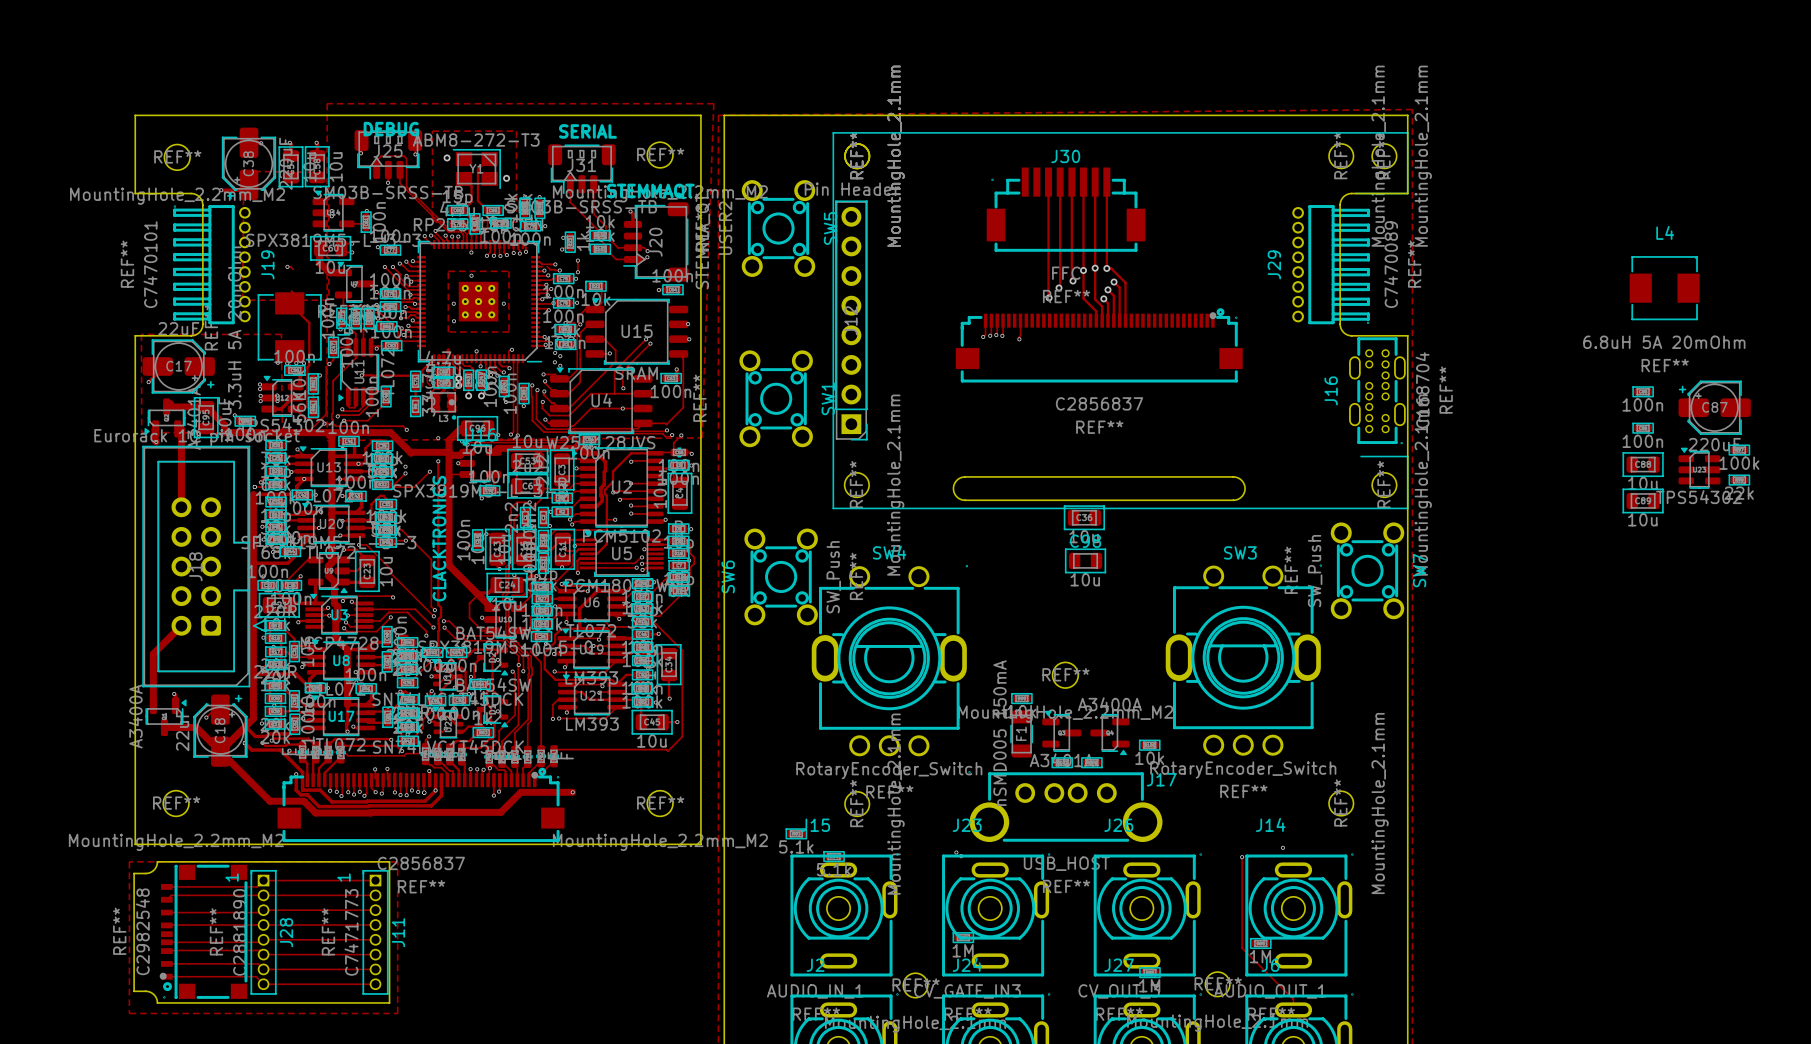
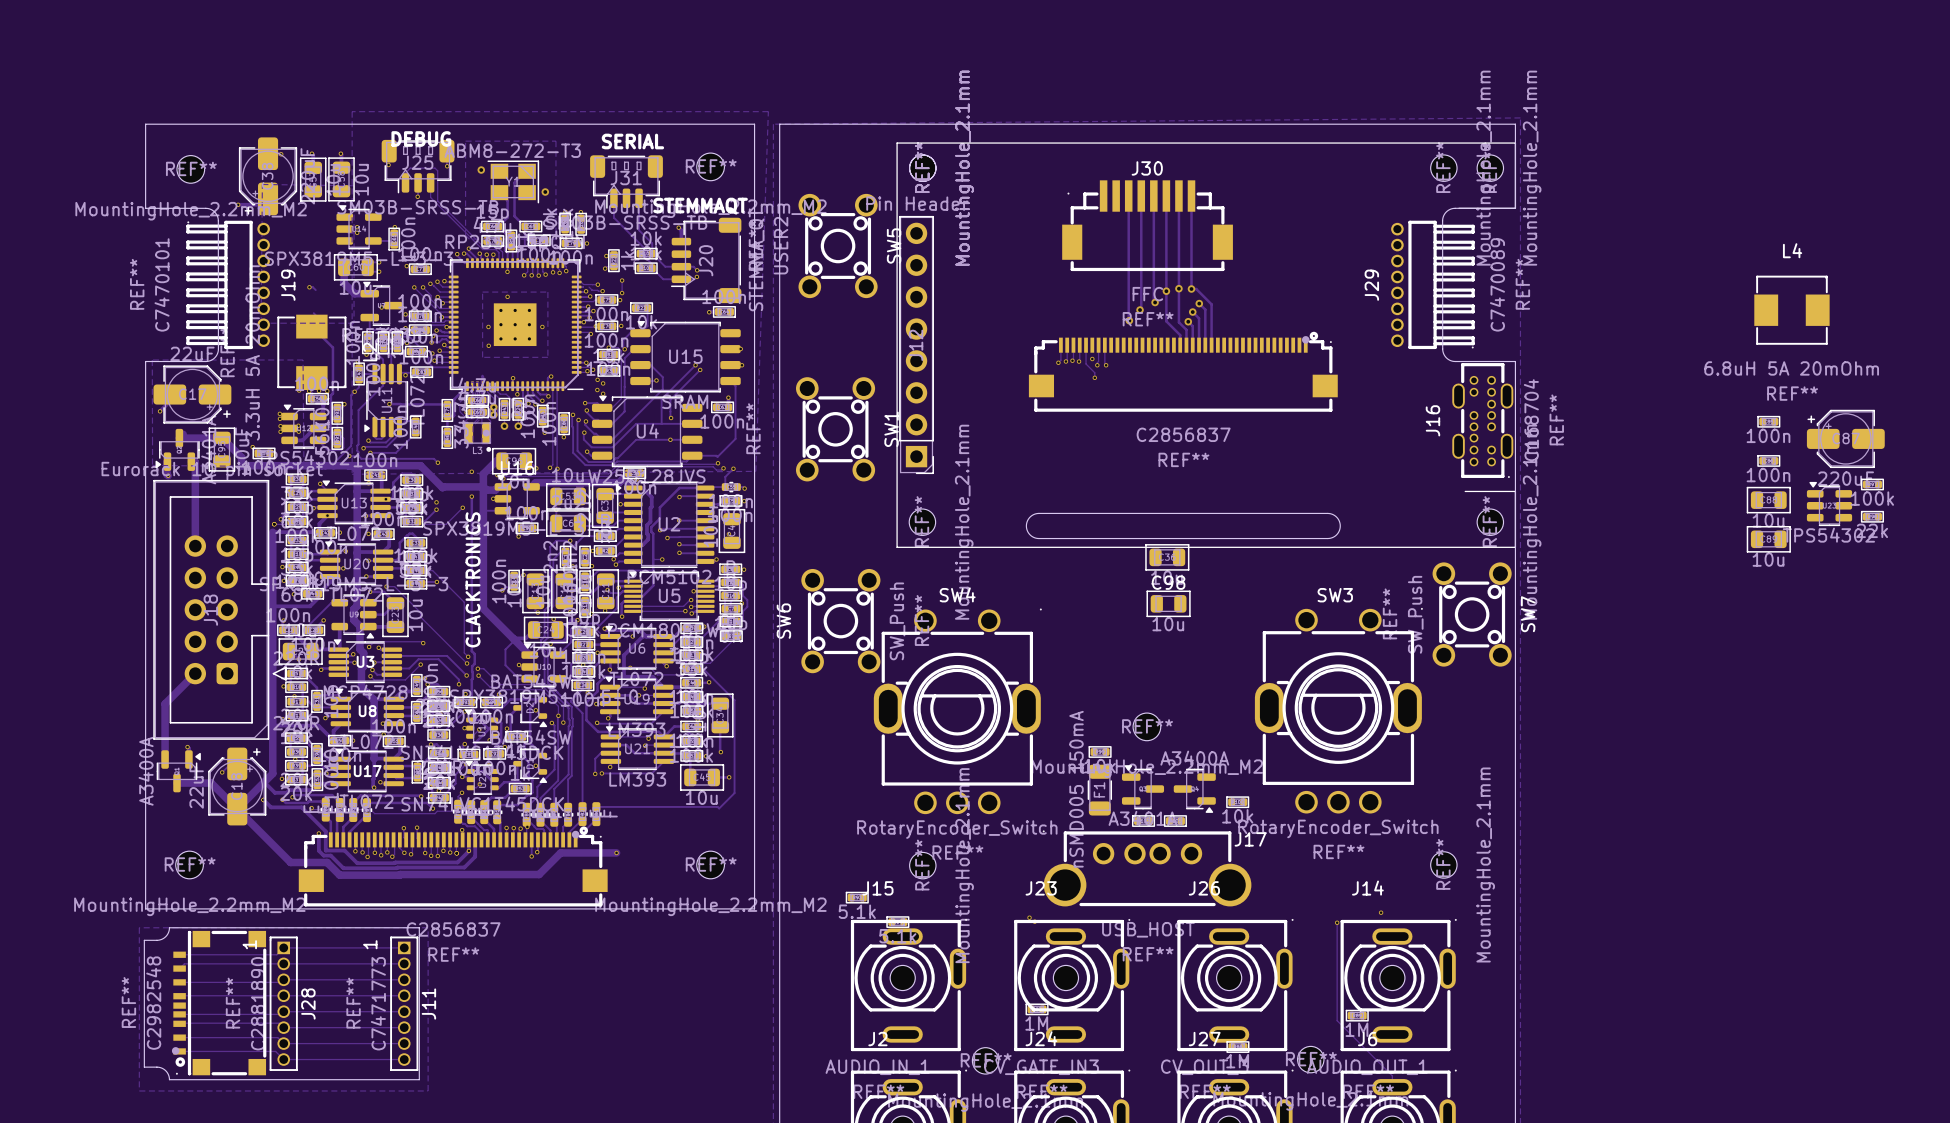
track: none -> (1086, 345) (1086, 364) (1094, 372) (1094, 377)
track: none -> (1104, 345) (1106, 365)
via: none -> (1092, 358)
via: none -> (1106, 365)
via: none -> (1094, 377)

